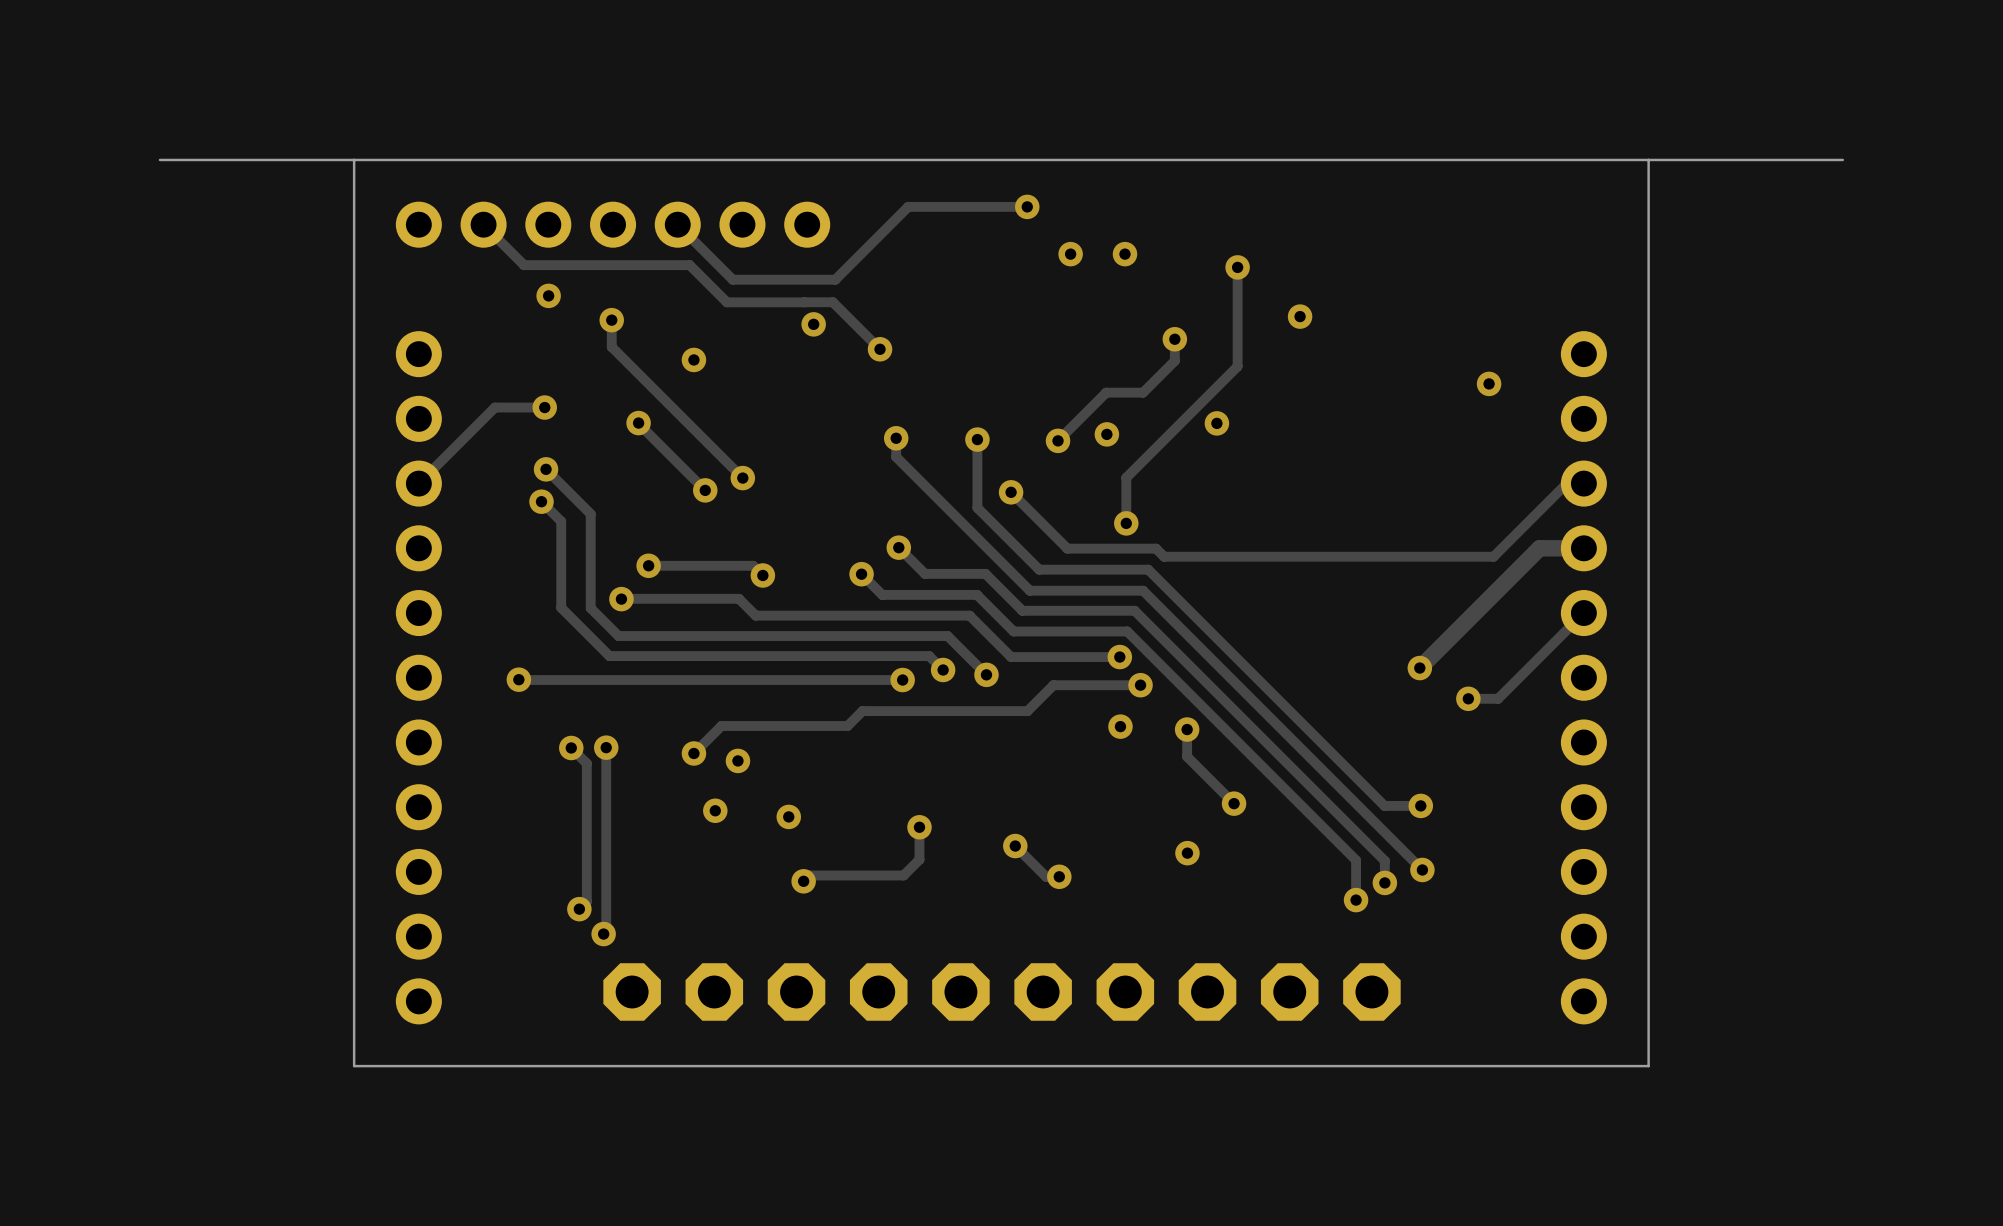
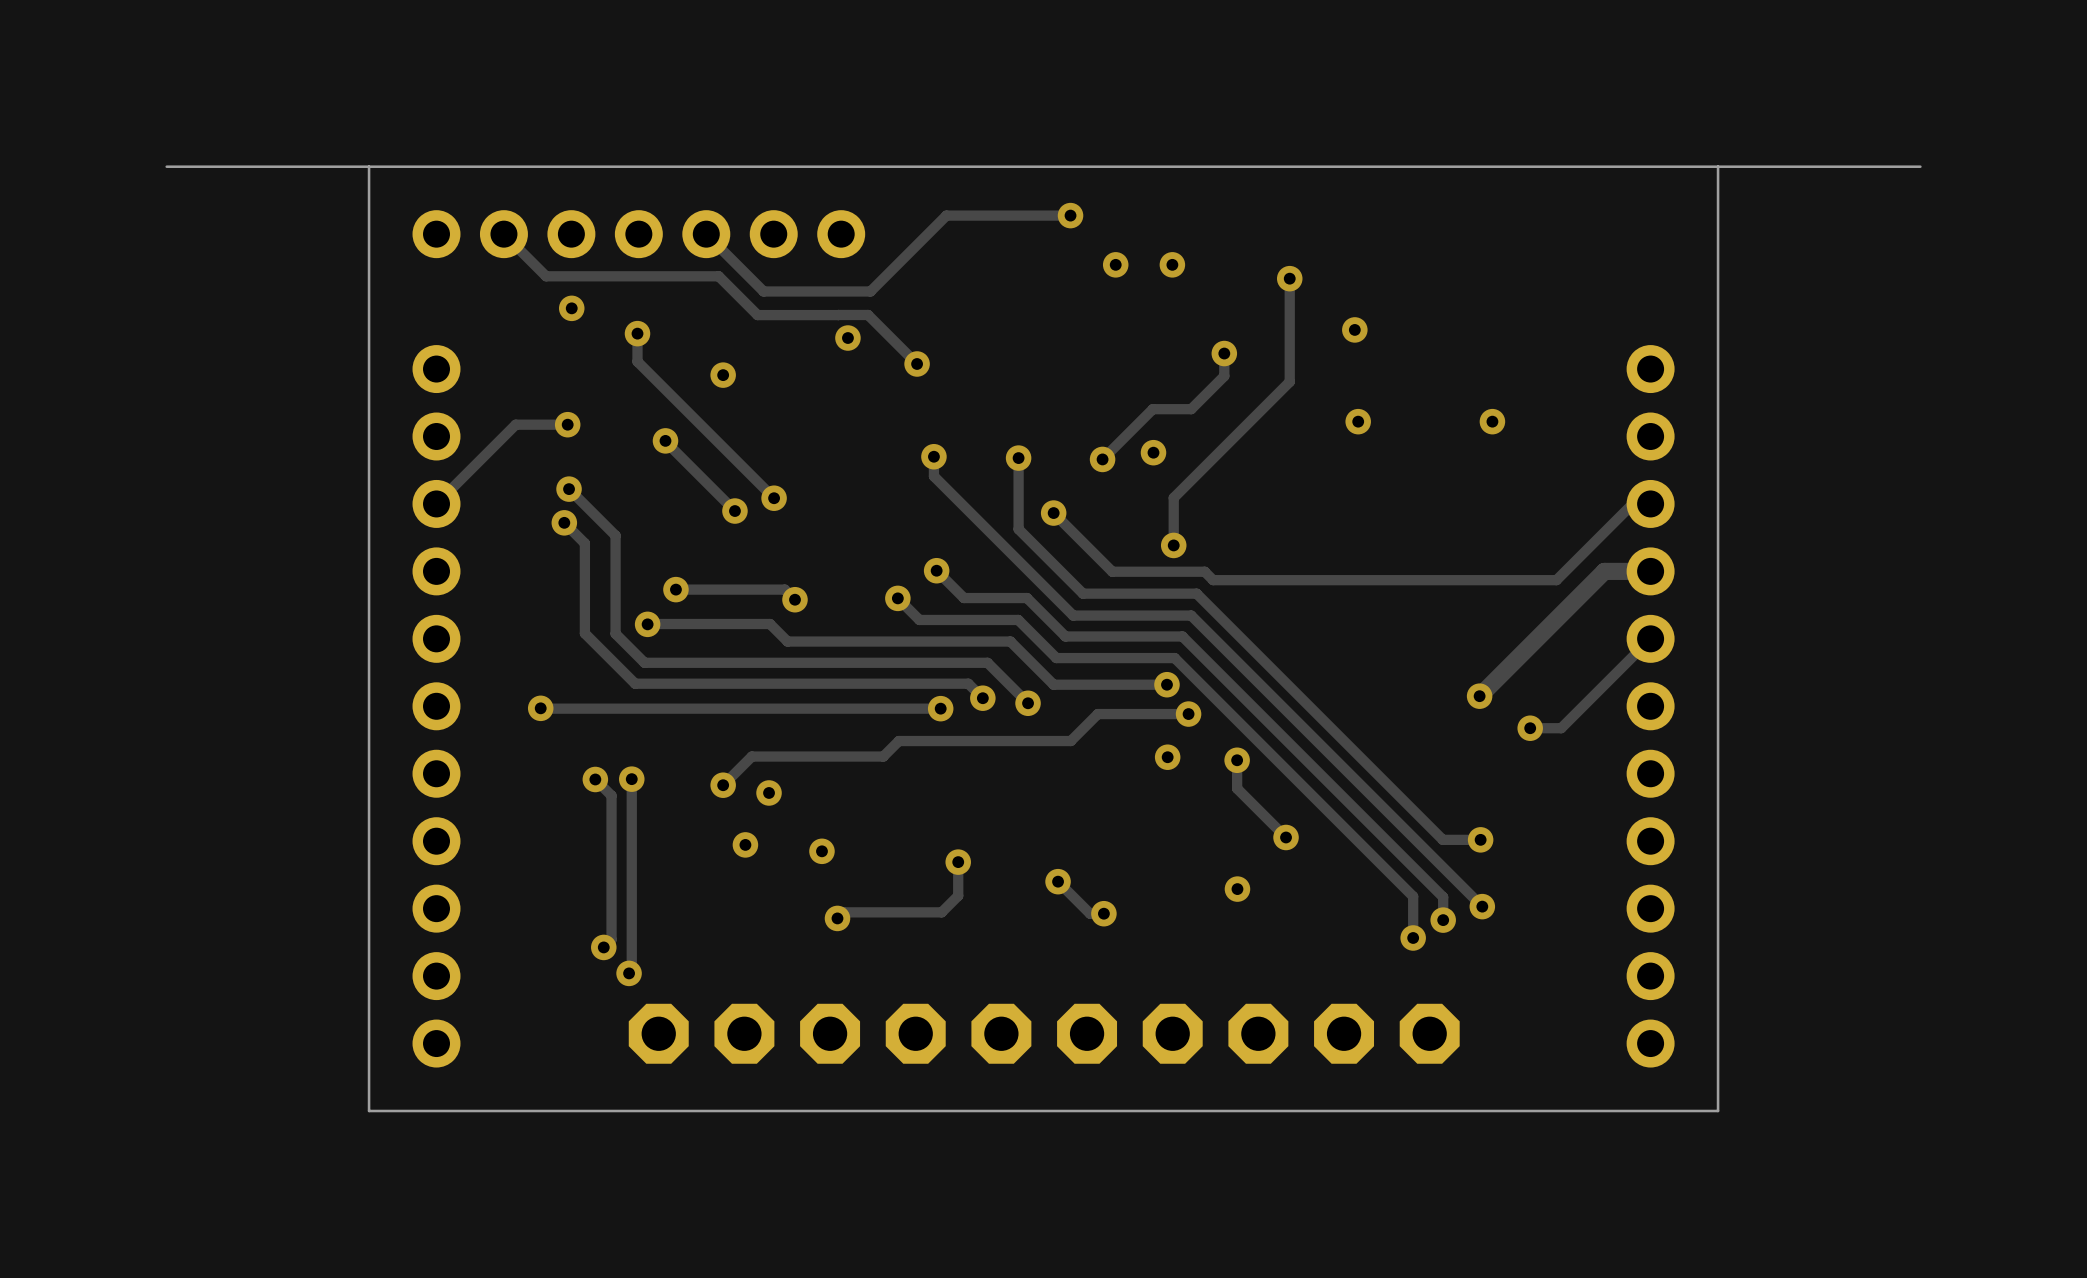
via position: (1489, 383) -> (1492, 421)
via position: (1216, 423) -> (1358, 421)

